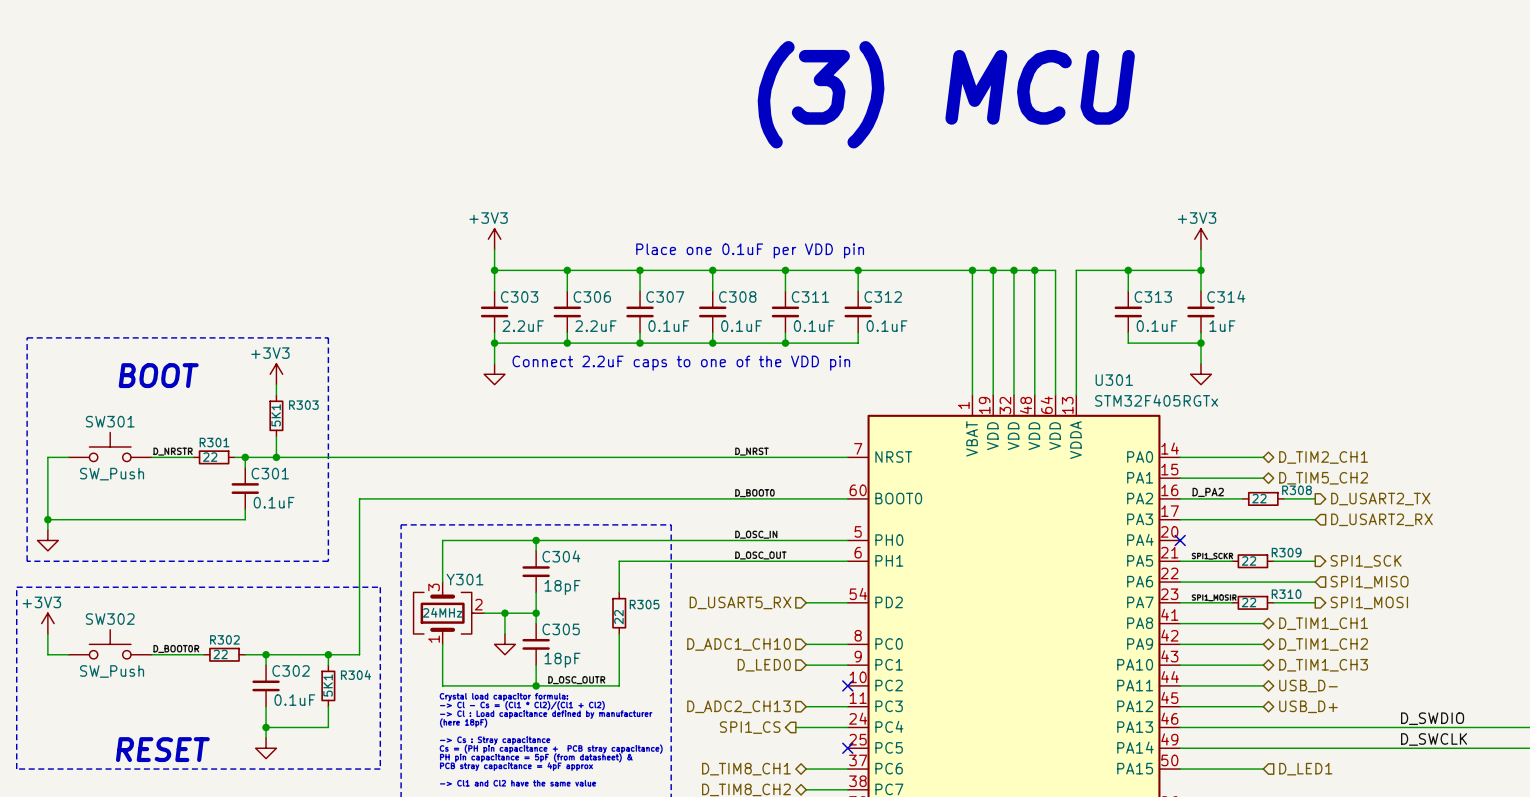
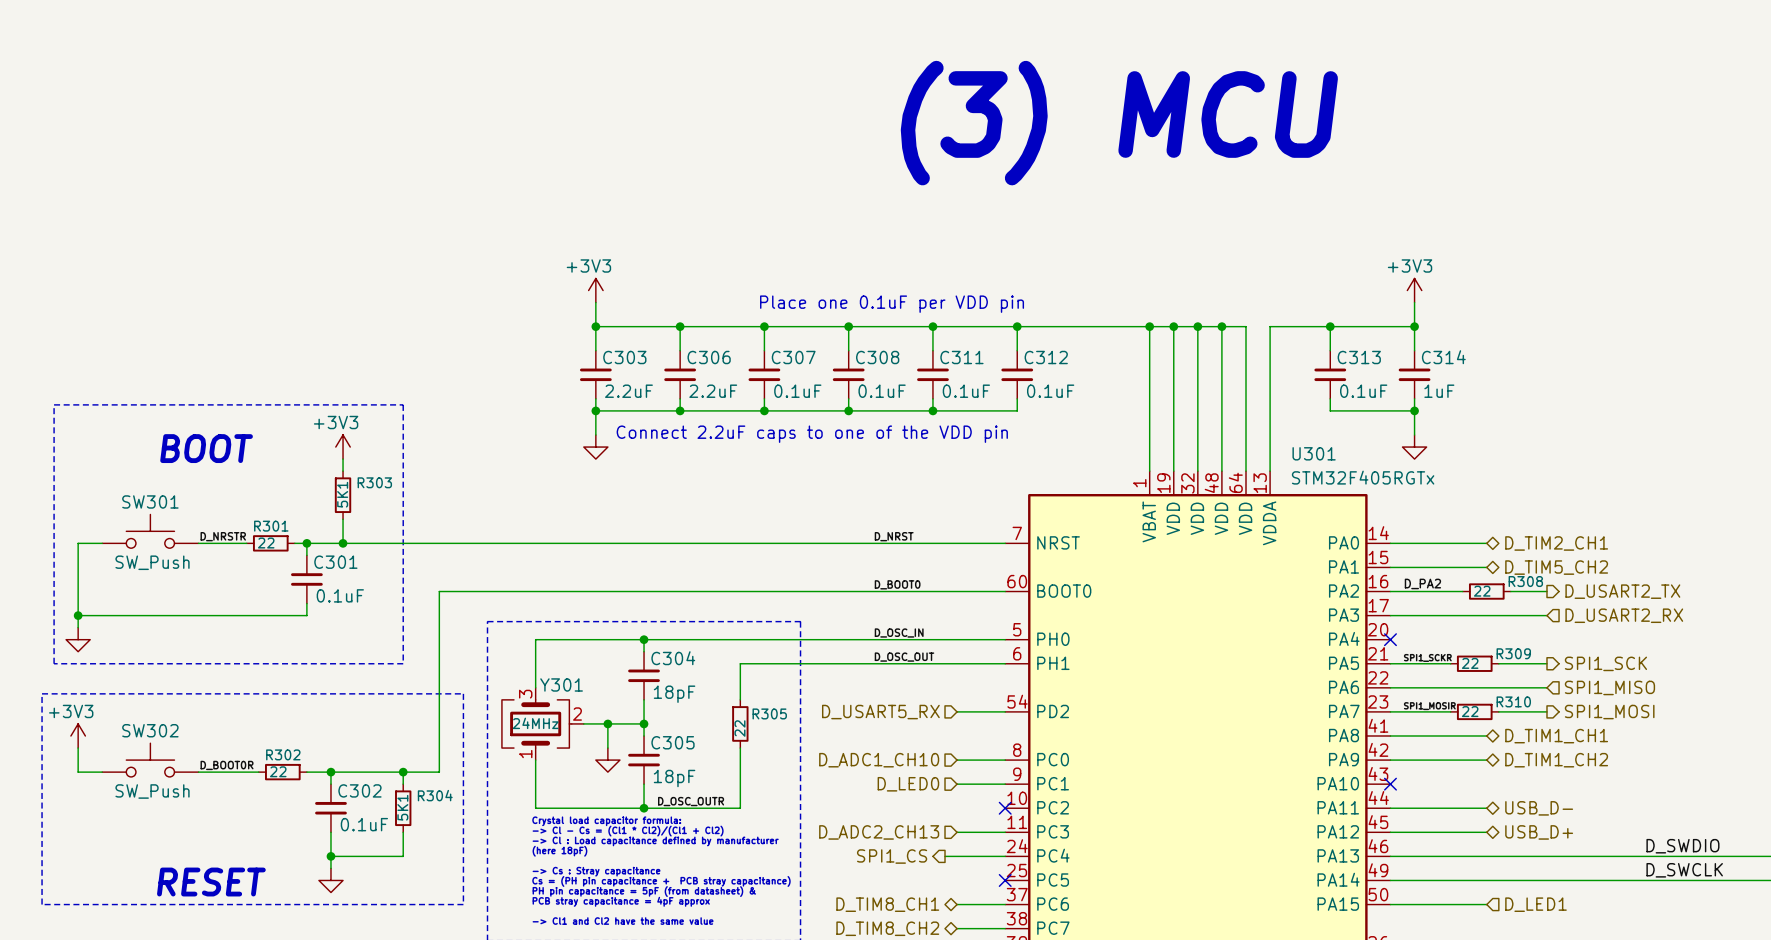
wire: (1180, 665) (1263, 665) -> none
no-connect mark: none -> (1390, 784)
hierarchical label: D_TIM1_CH3 (1323, 665) -> none

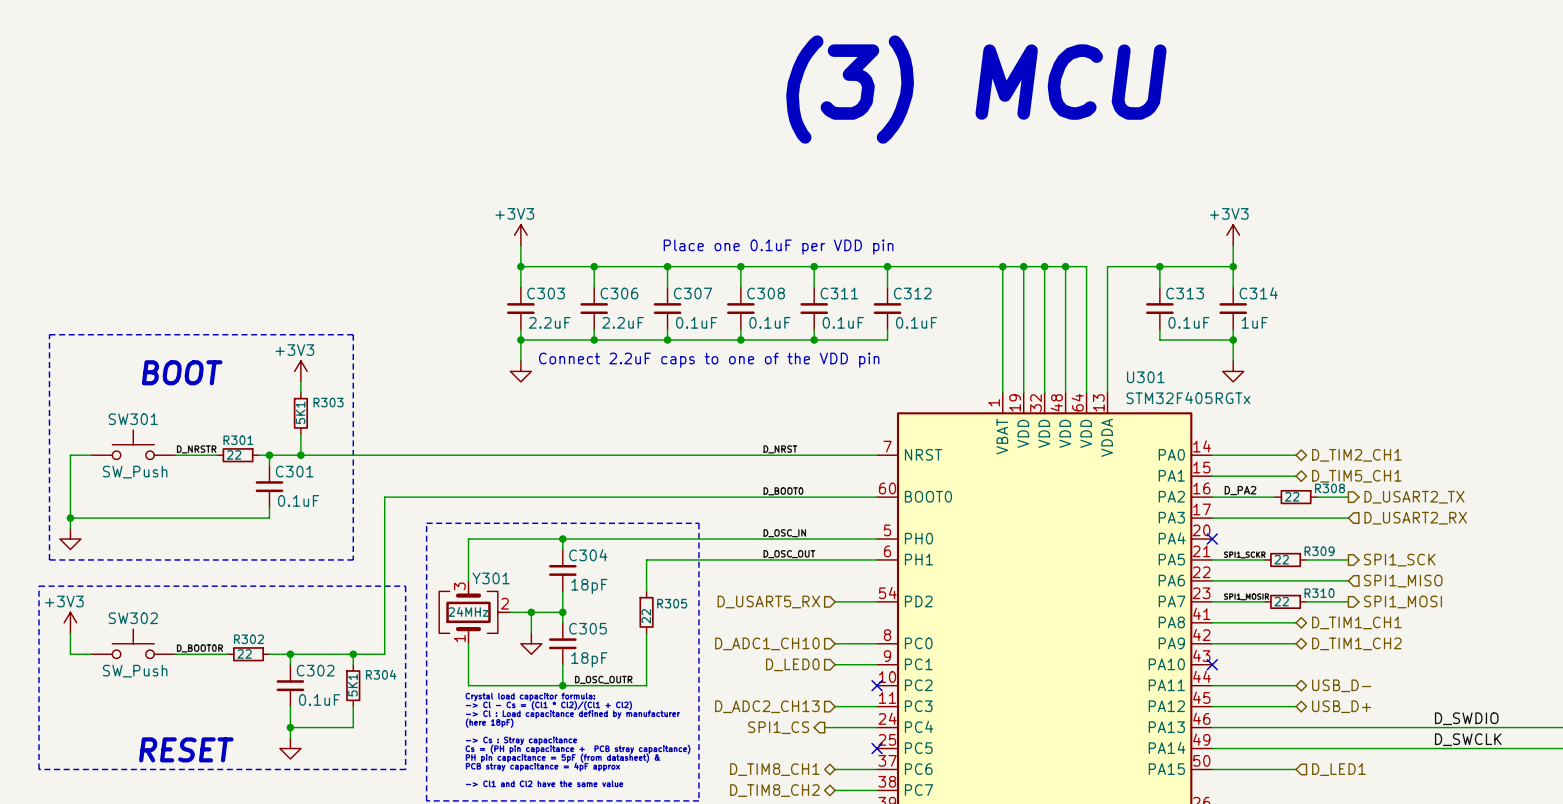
hierarchical label: D_TIM5_CH2 (1556, 567) -> D_TIM5_CH1 (1356, 476)

